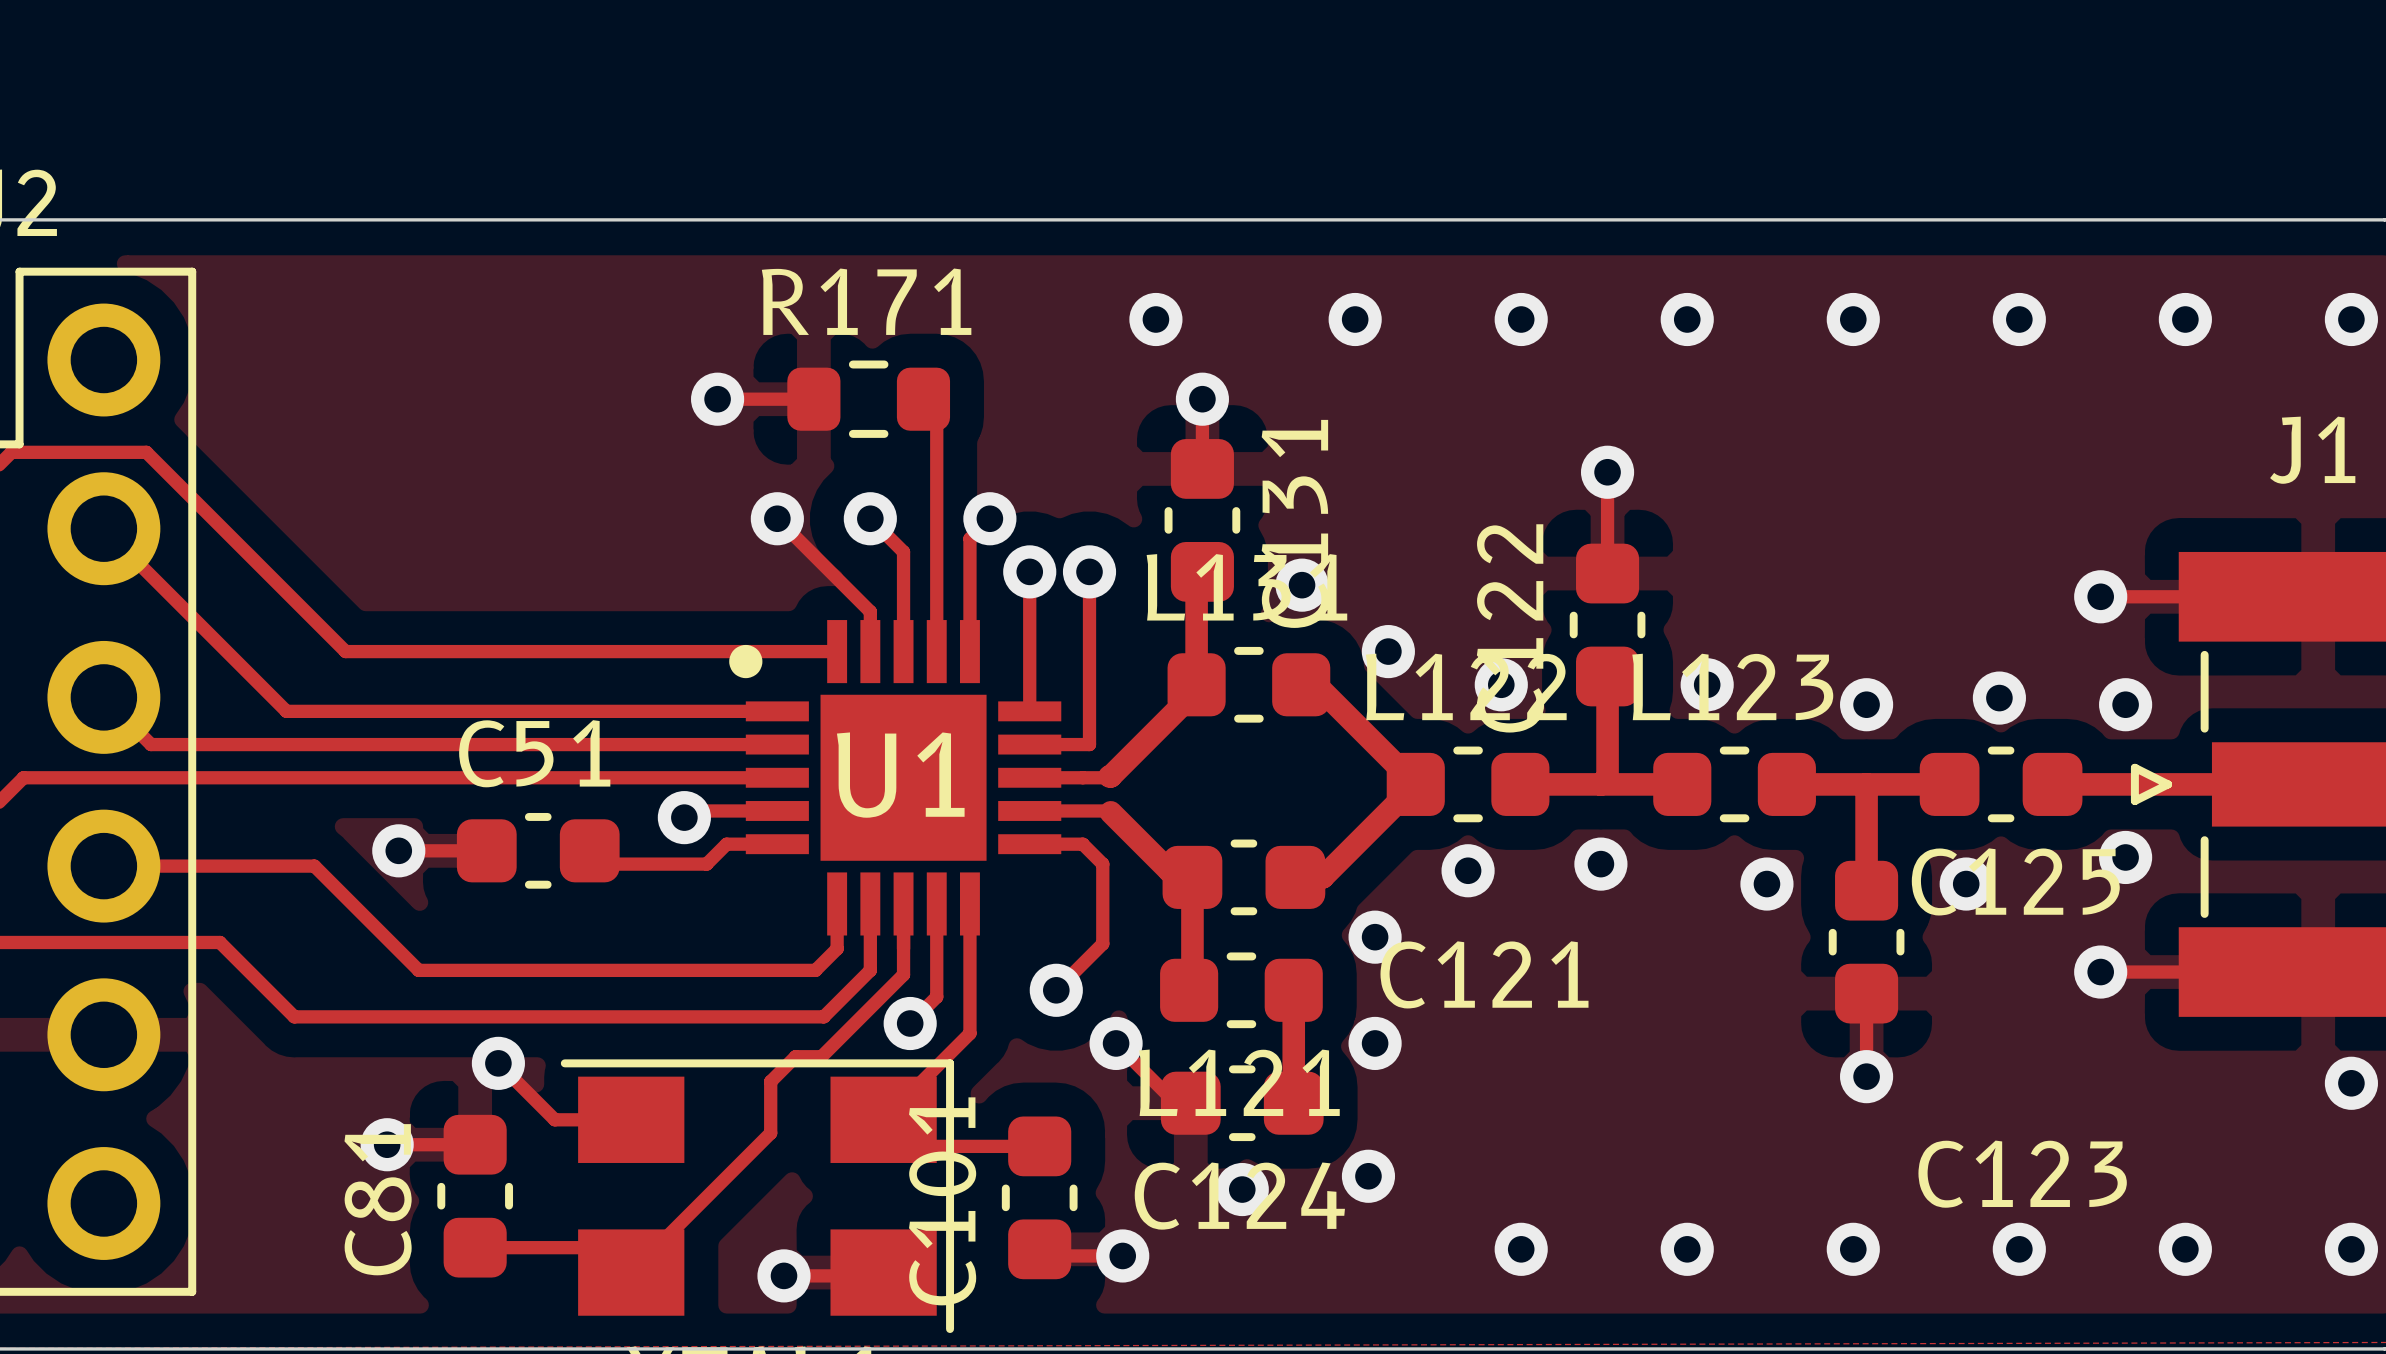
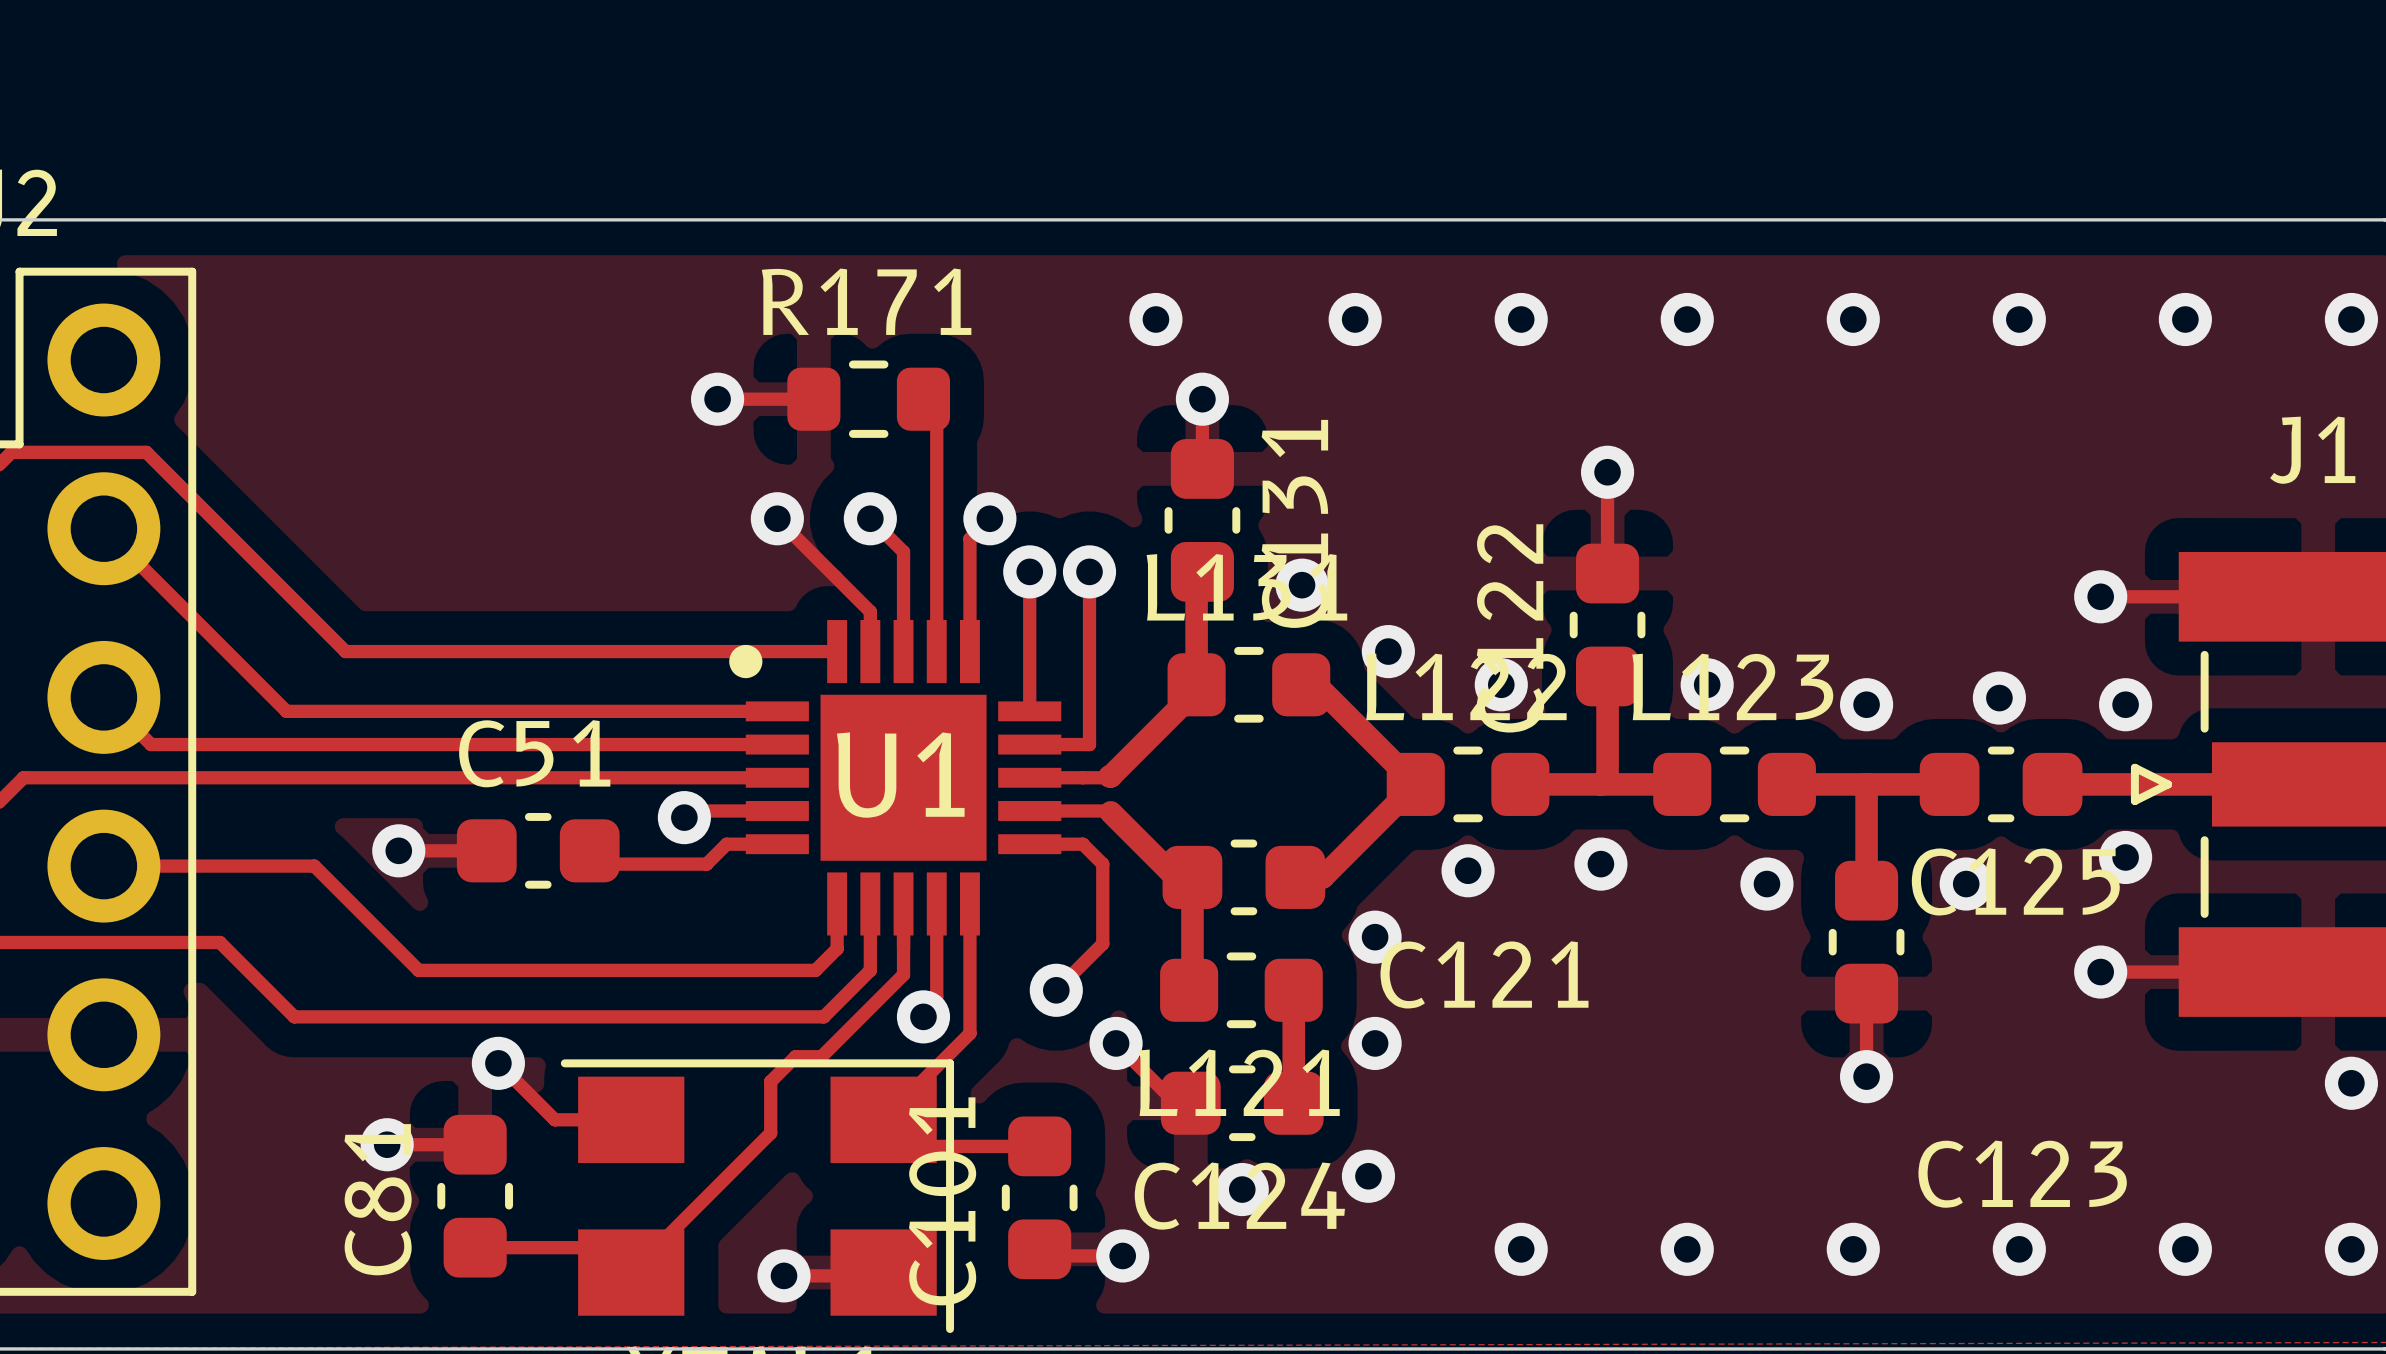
via position: (910, 1023) -> (923, 1016)

